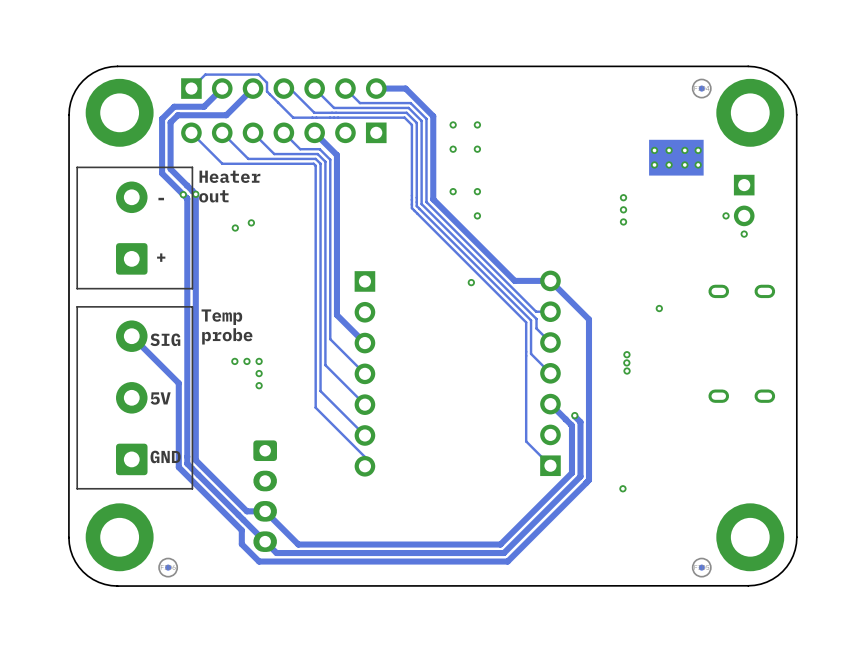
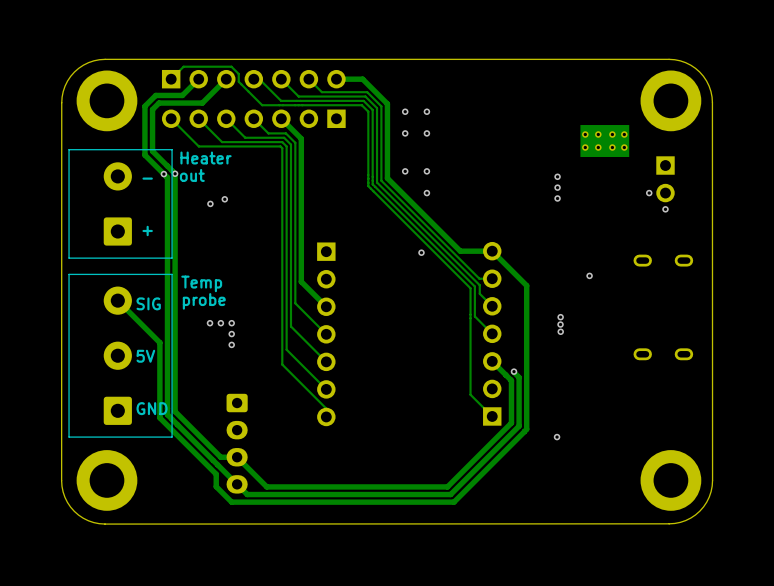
part: (701, 88) -> none
part: (168, 567) -> none
part: (701, 567) -> none

